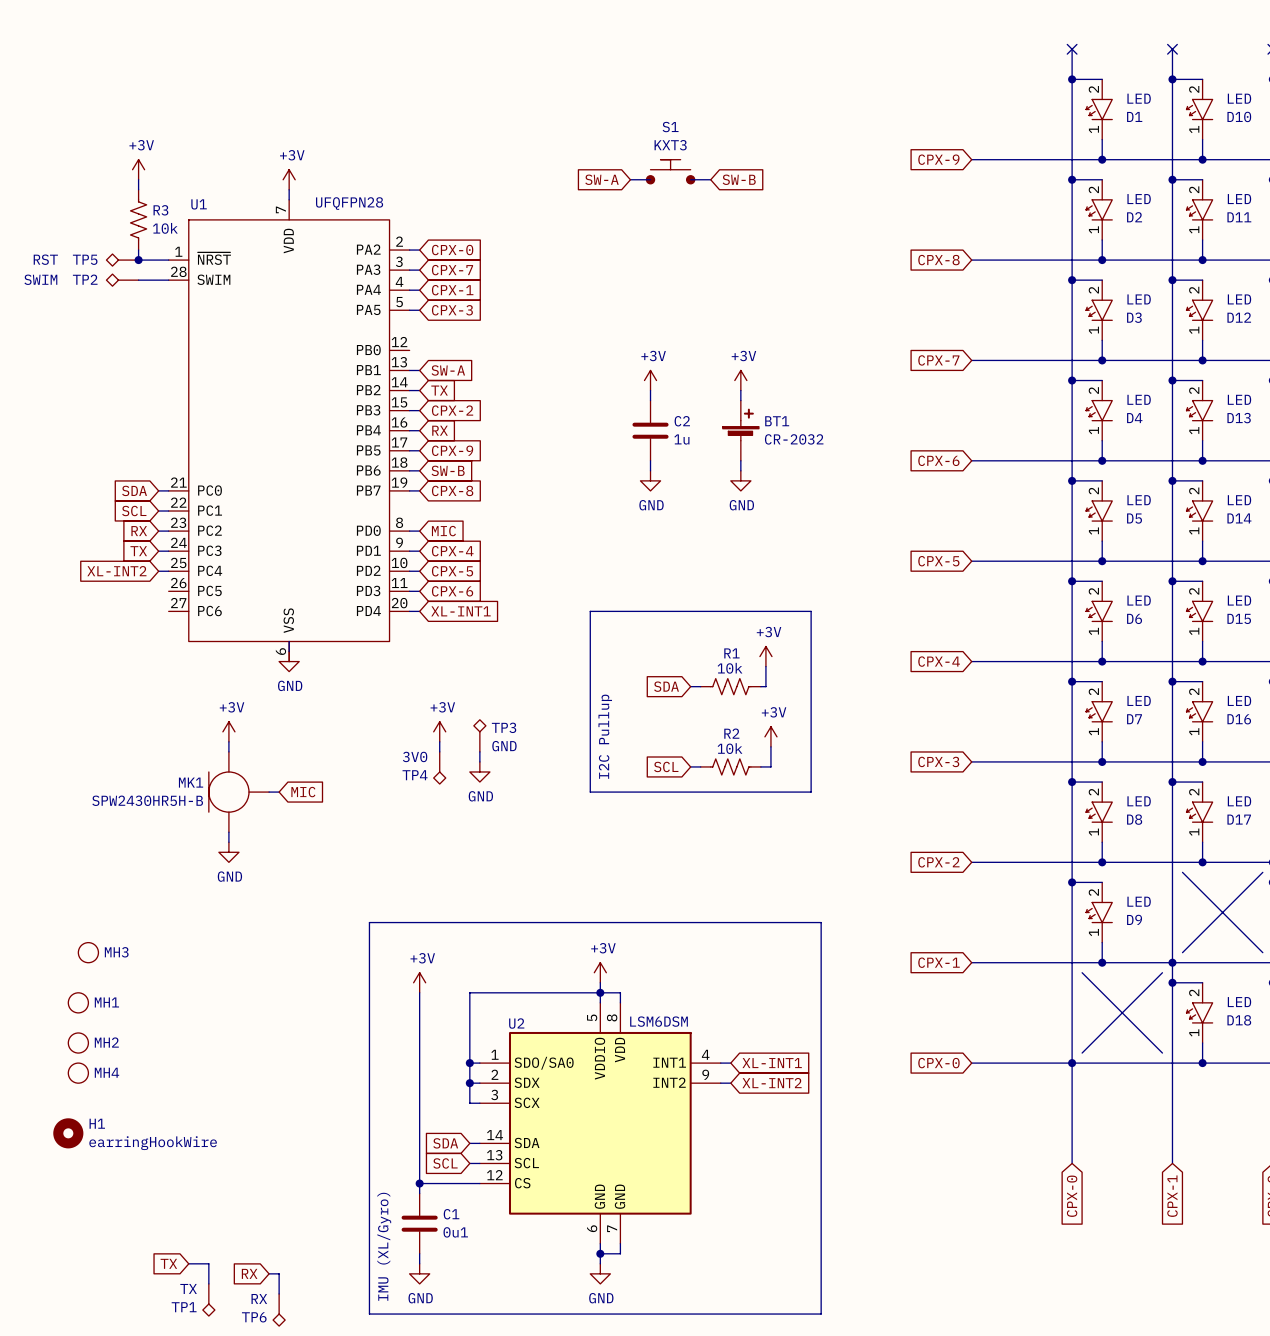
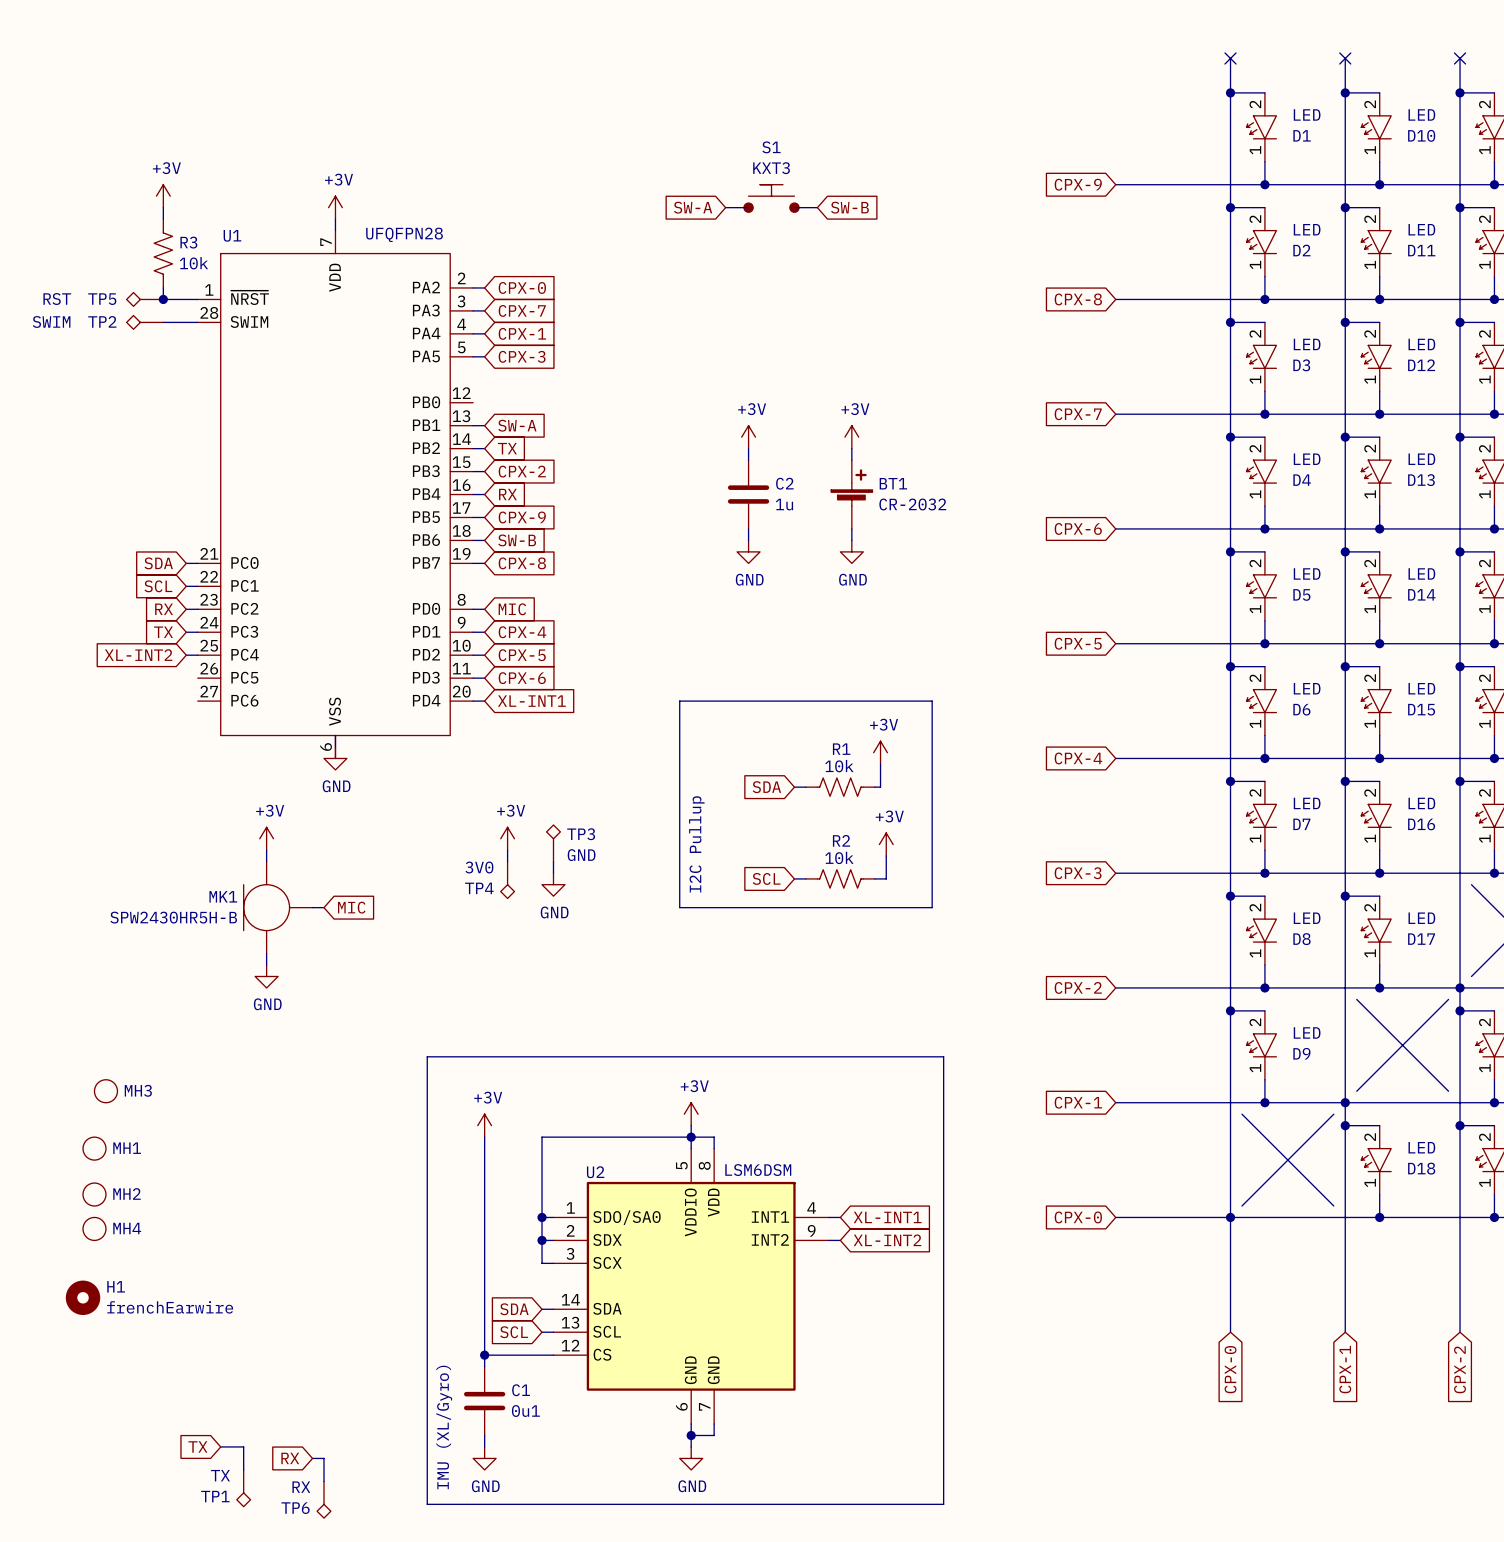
H1 value: earringHookWire (153, 1143) -> frenchEarwire (170, 1307)

